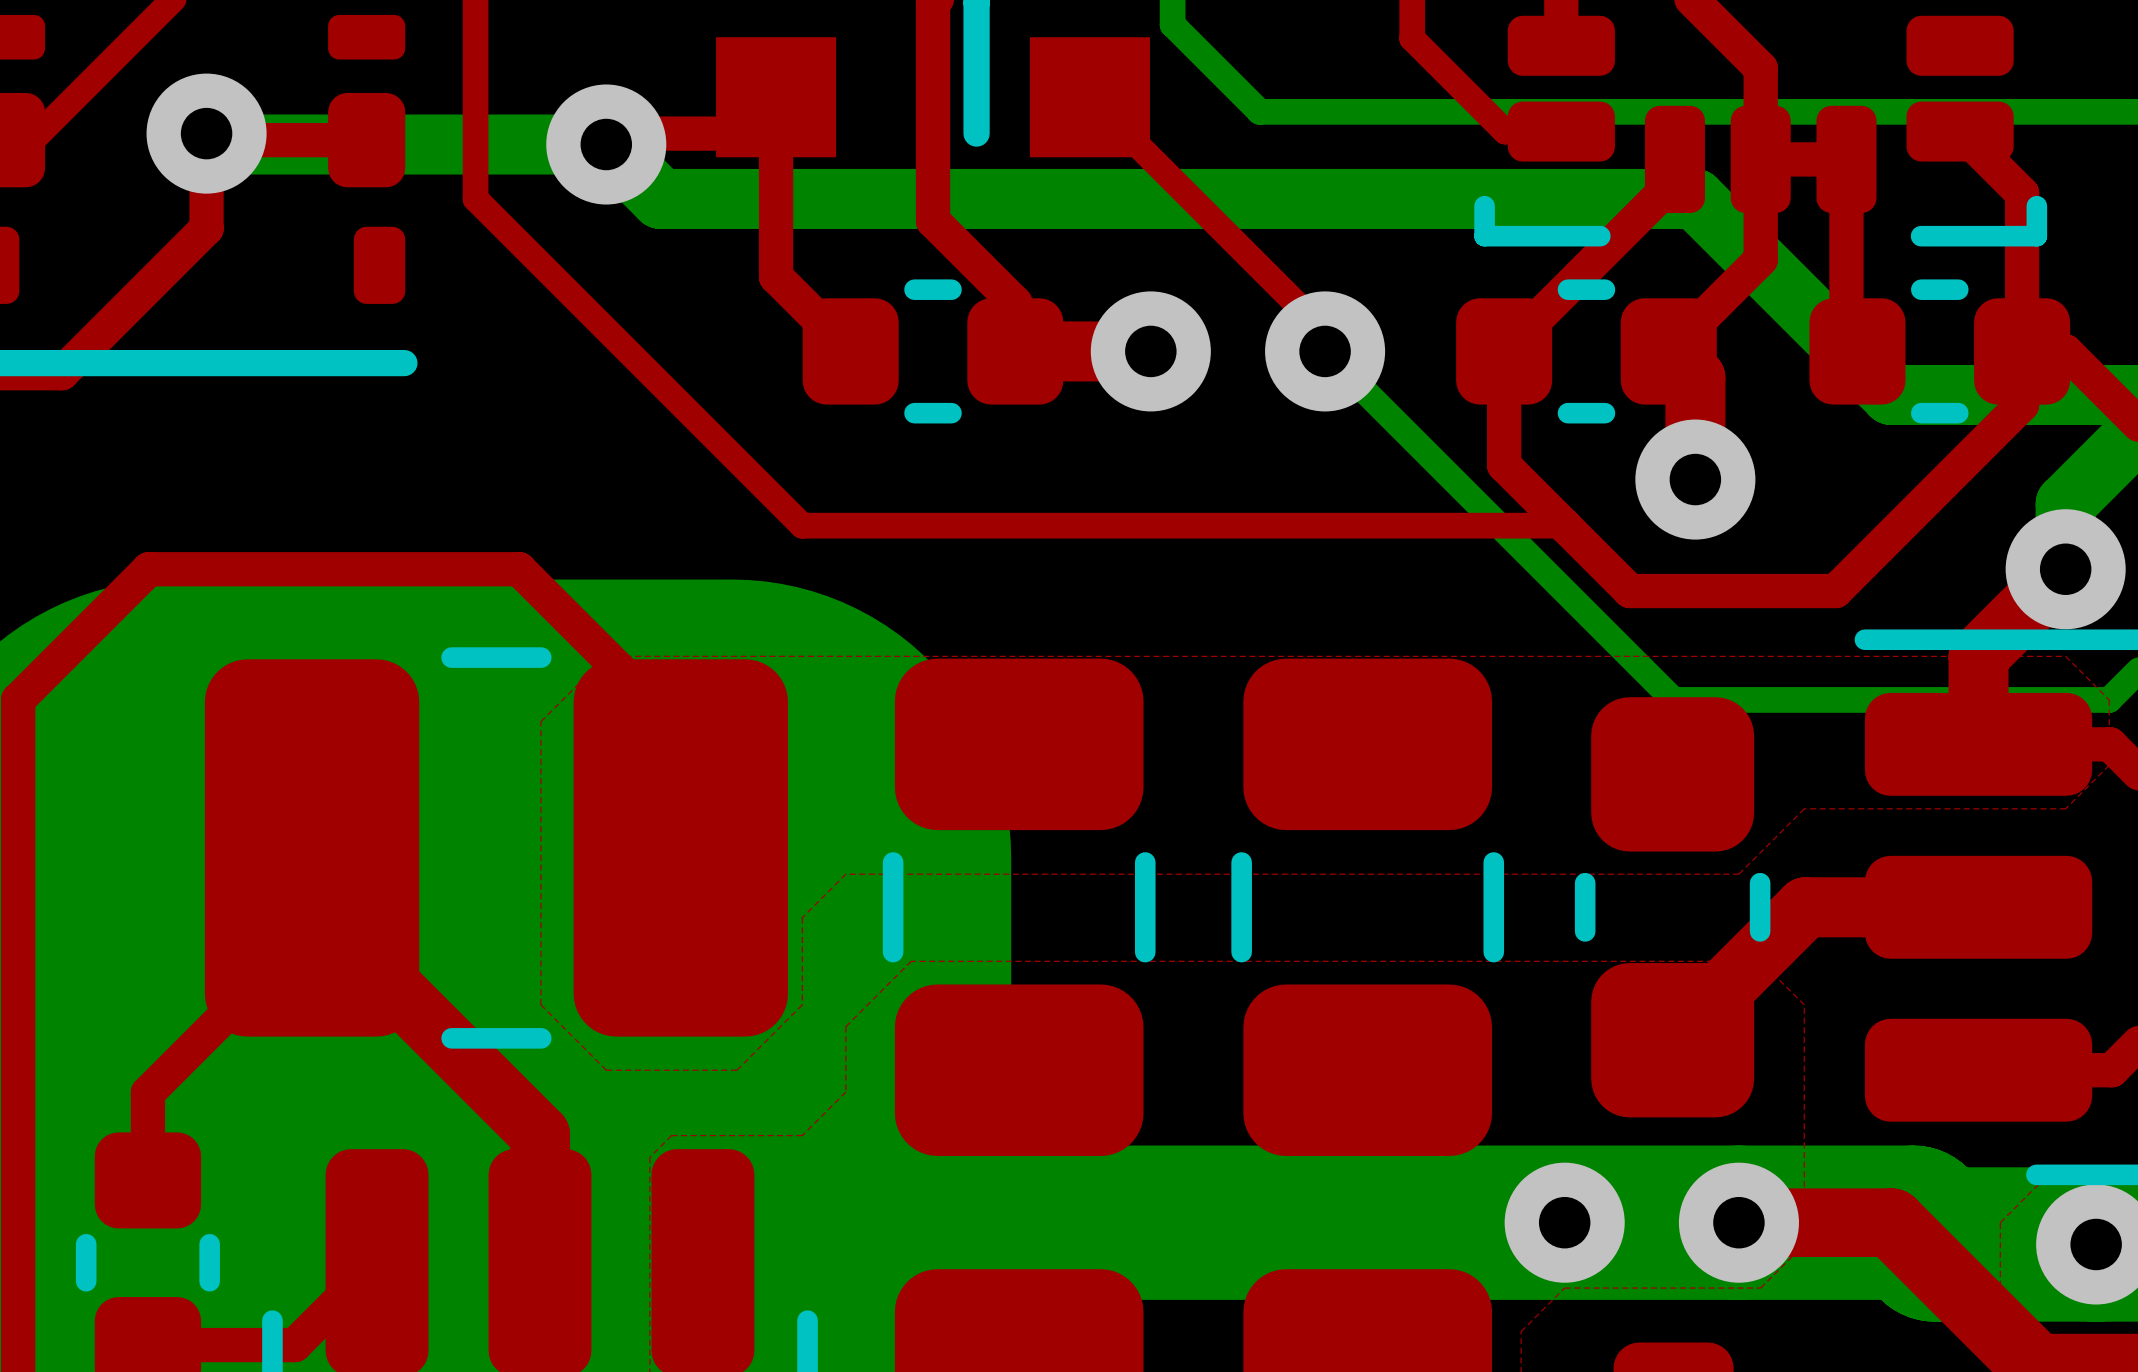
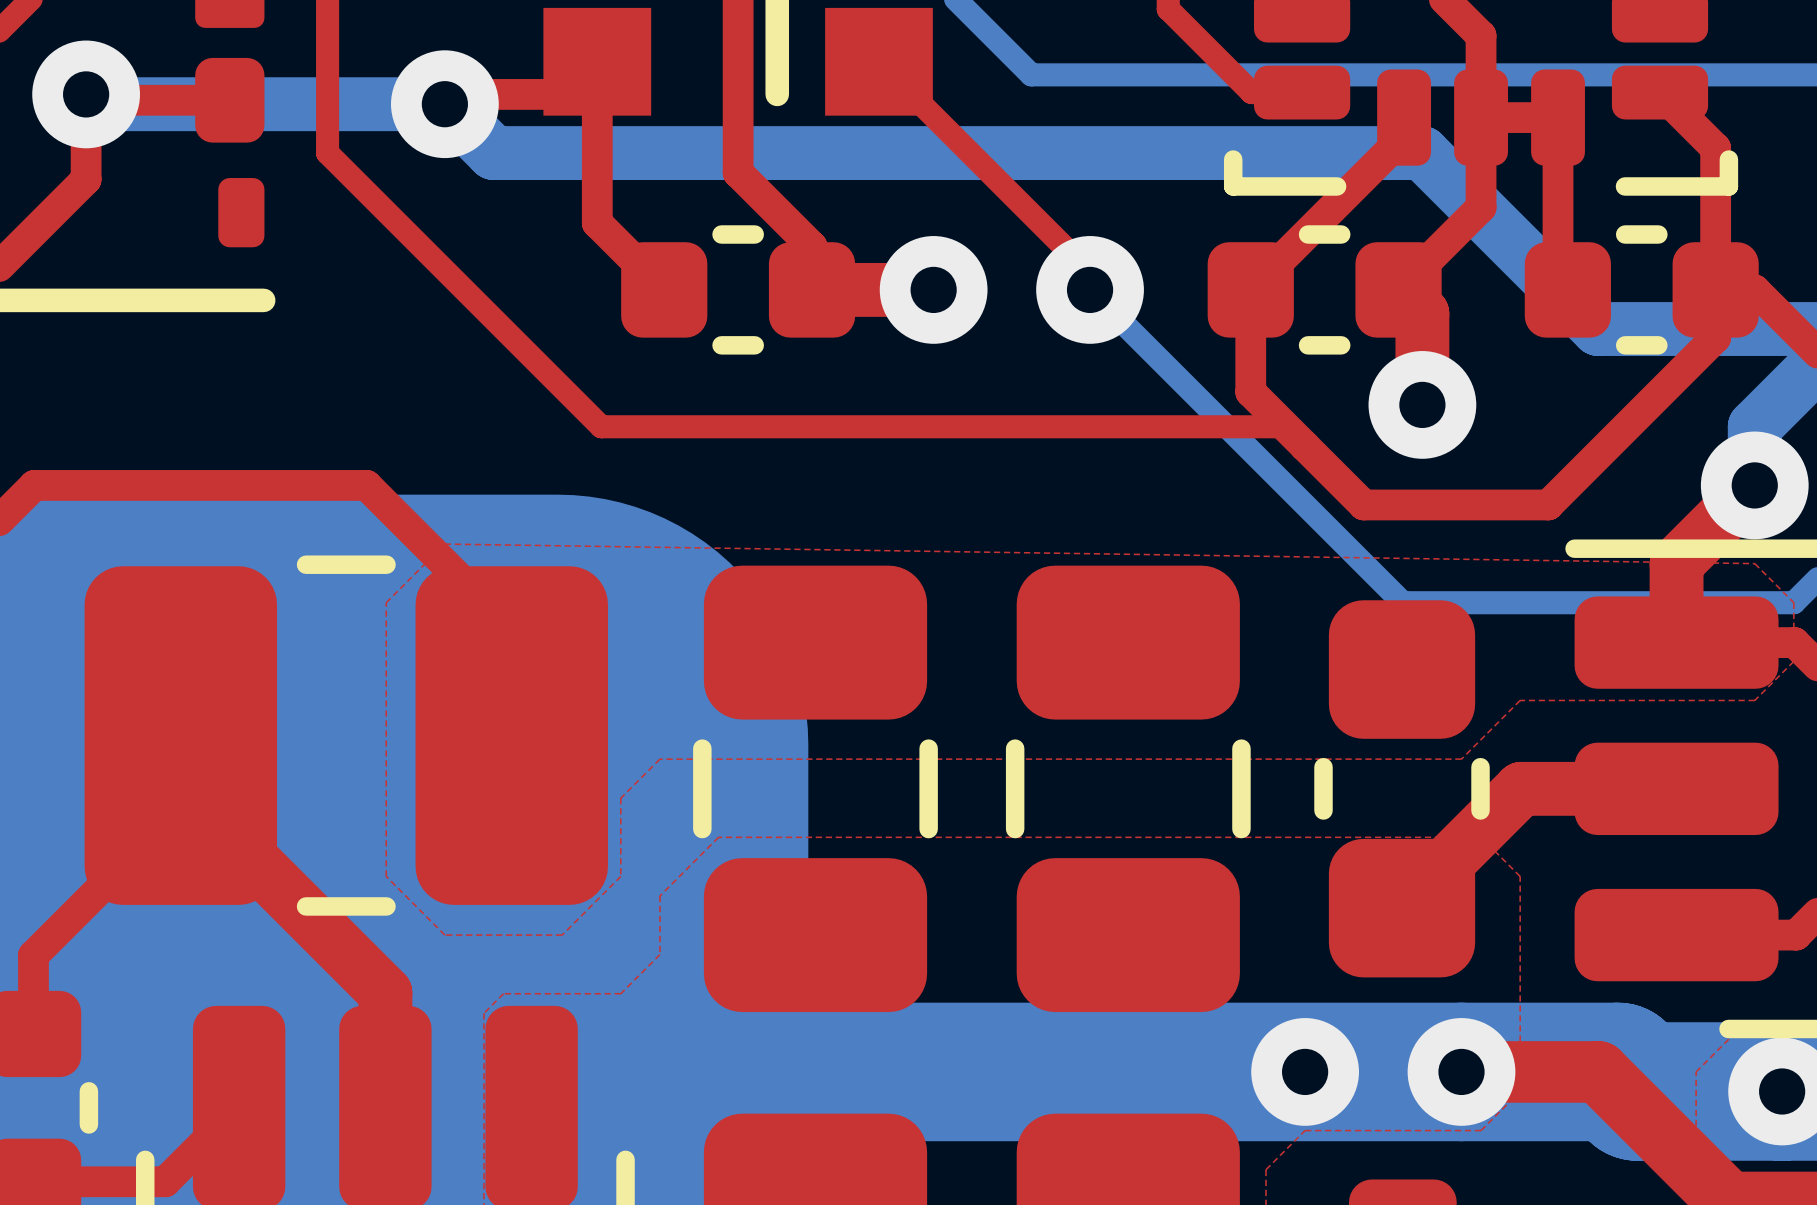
top track: (780, 503) (802, 525) (1564, 525) -> (601, 426) (1285, 426) (1305, 446)
top zone outline: (2065, 656) (606, 656) (540, 721) -> (1754, 563) (444, 544) (386, 602) (386, 622)

